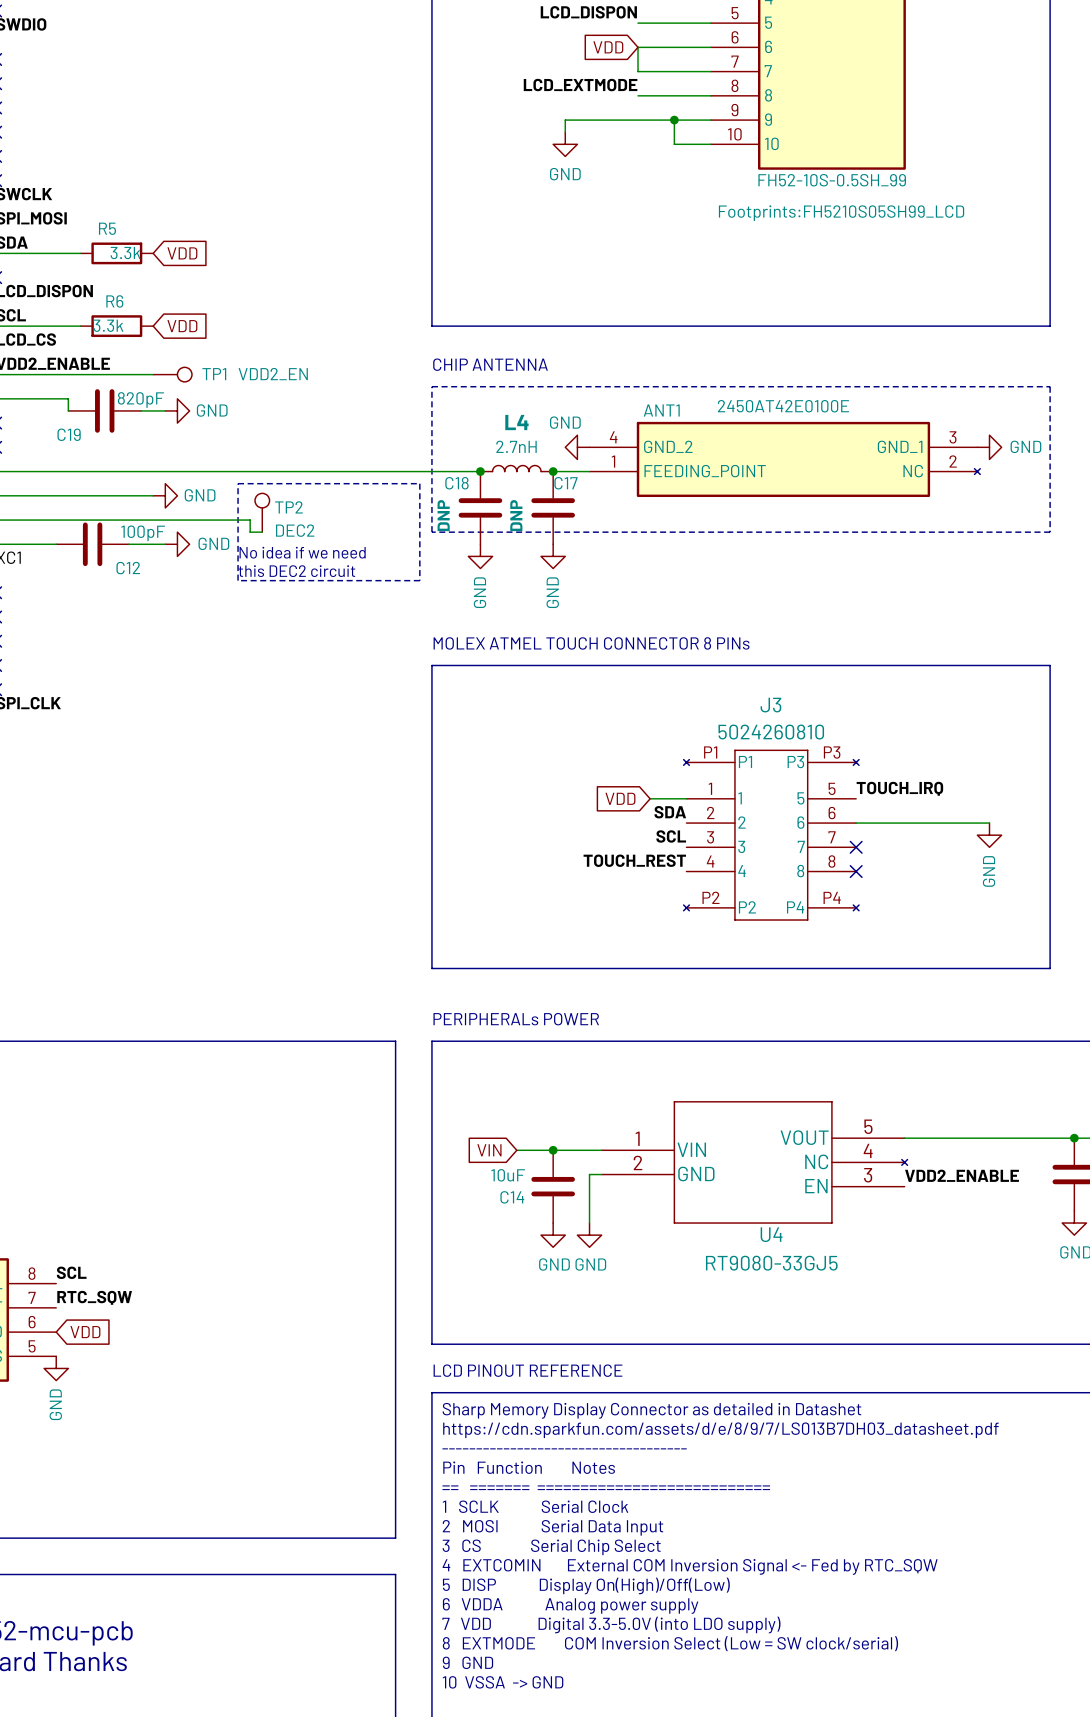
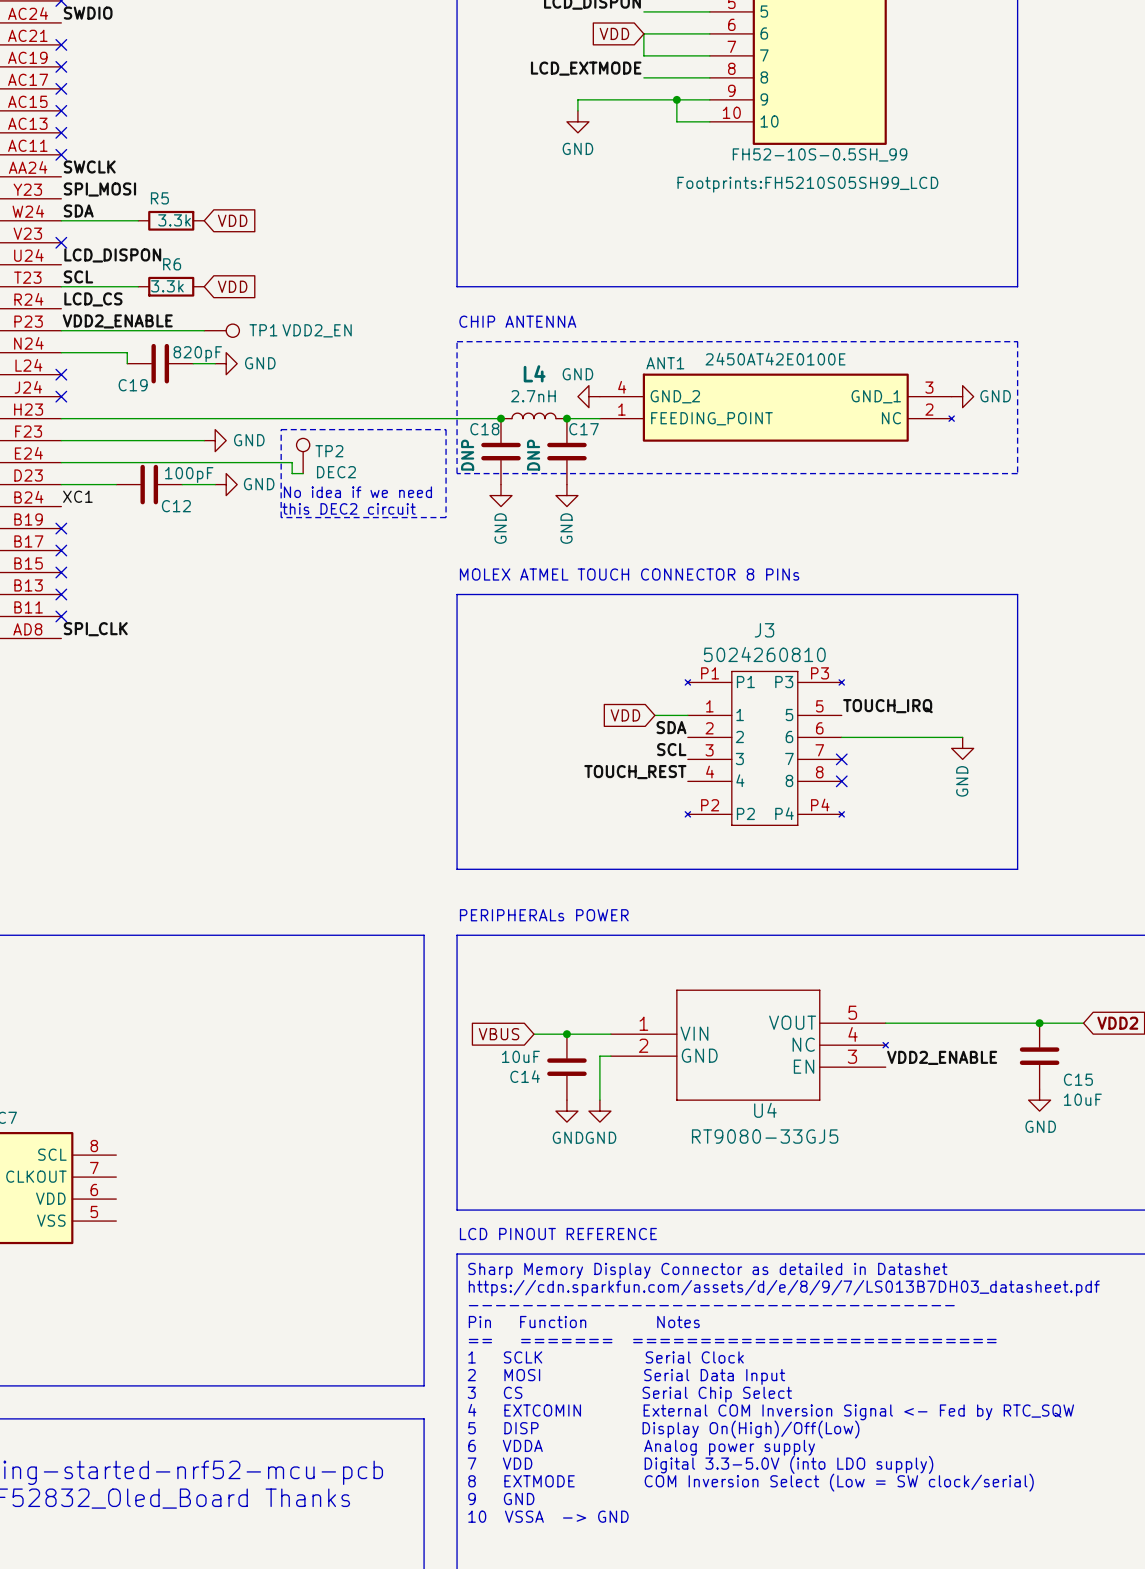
global label: VIN (489, 1150) -> VBUS (499, 1034)
label: SCL (71, 1272) -> none
label: RTC_SQW (94, 1297) -> none
global label: VDD (85, 1332) -> none
power symbol: GND (56, 1368) -> none

